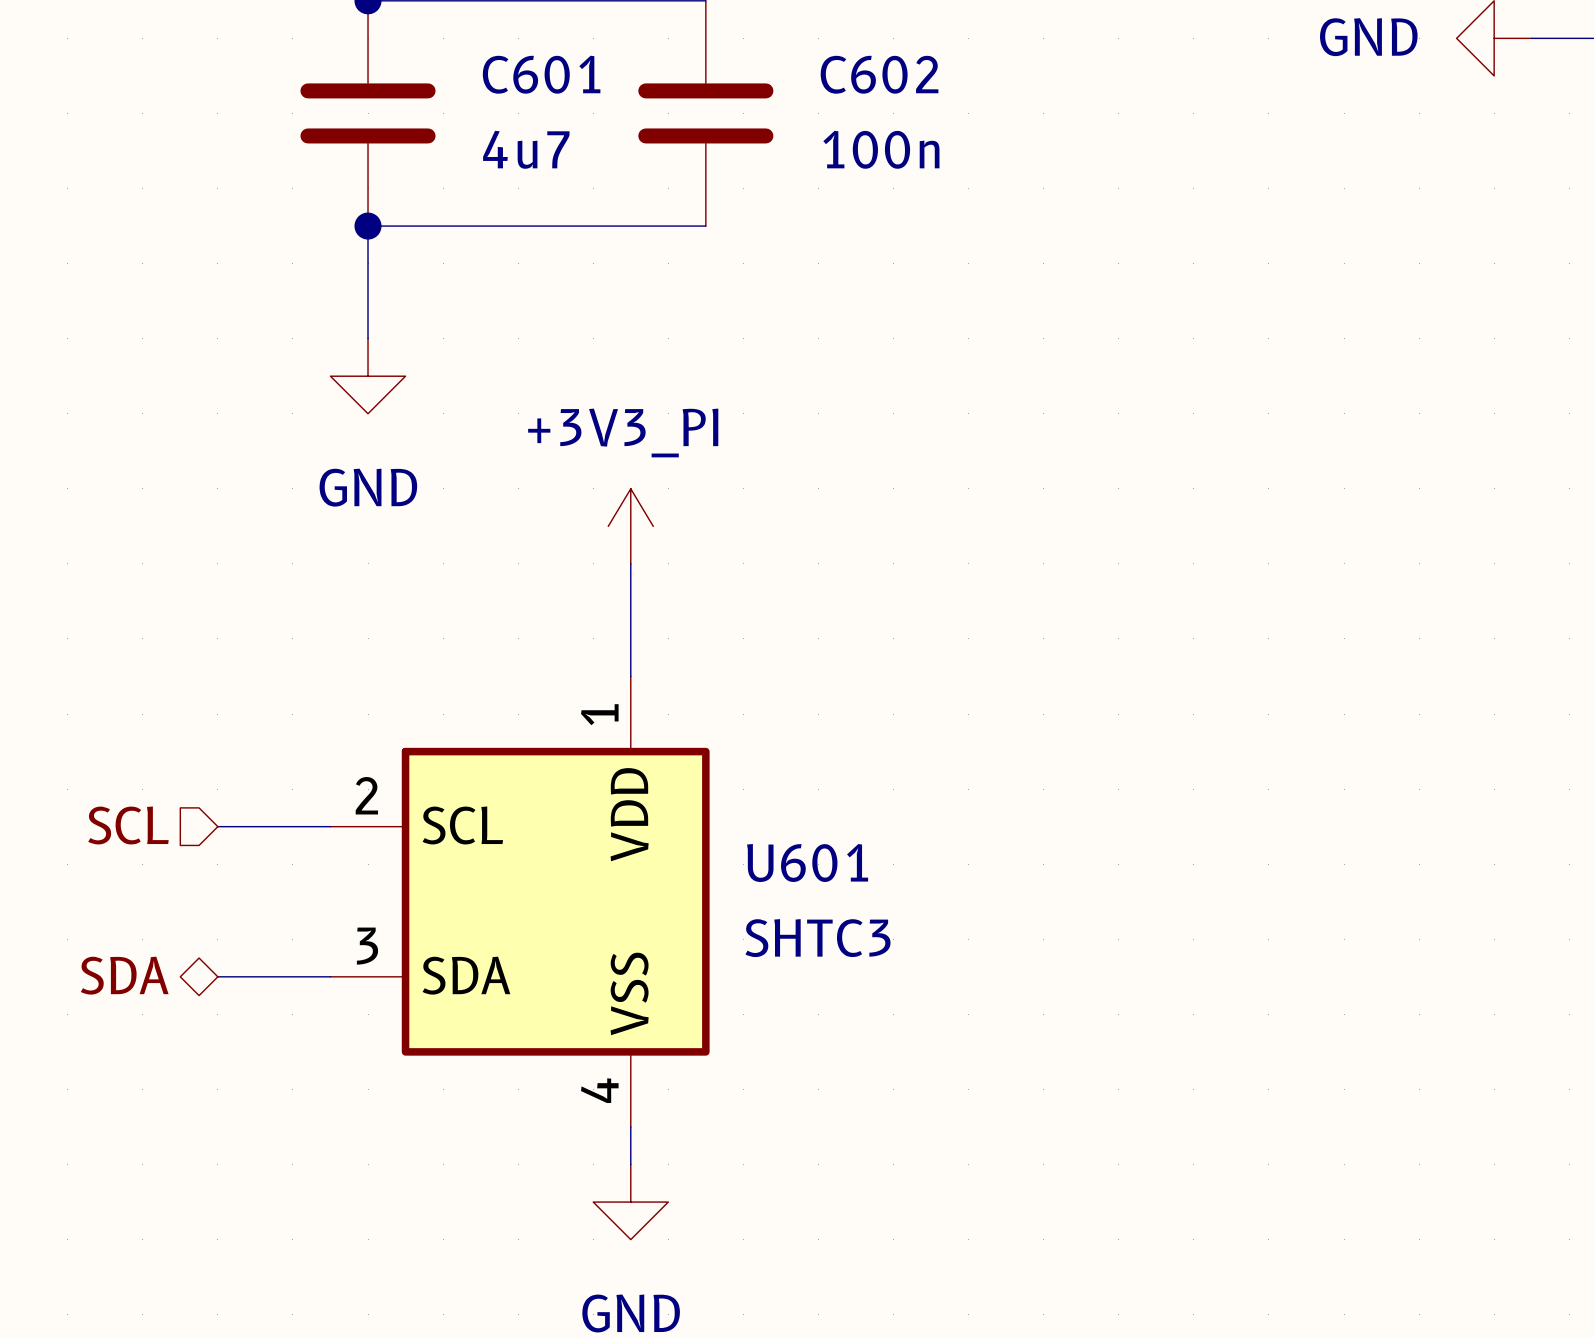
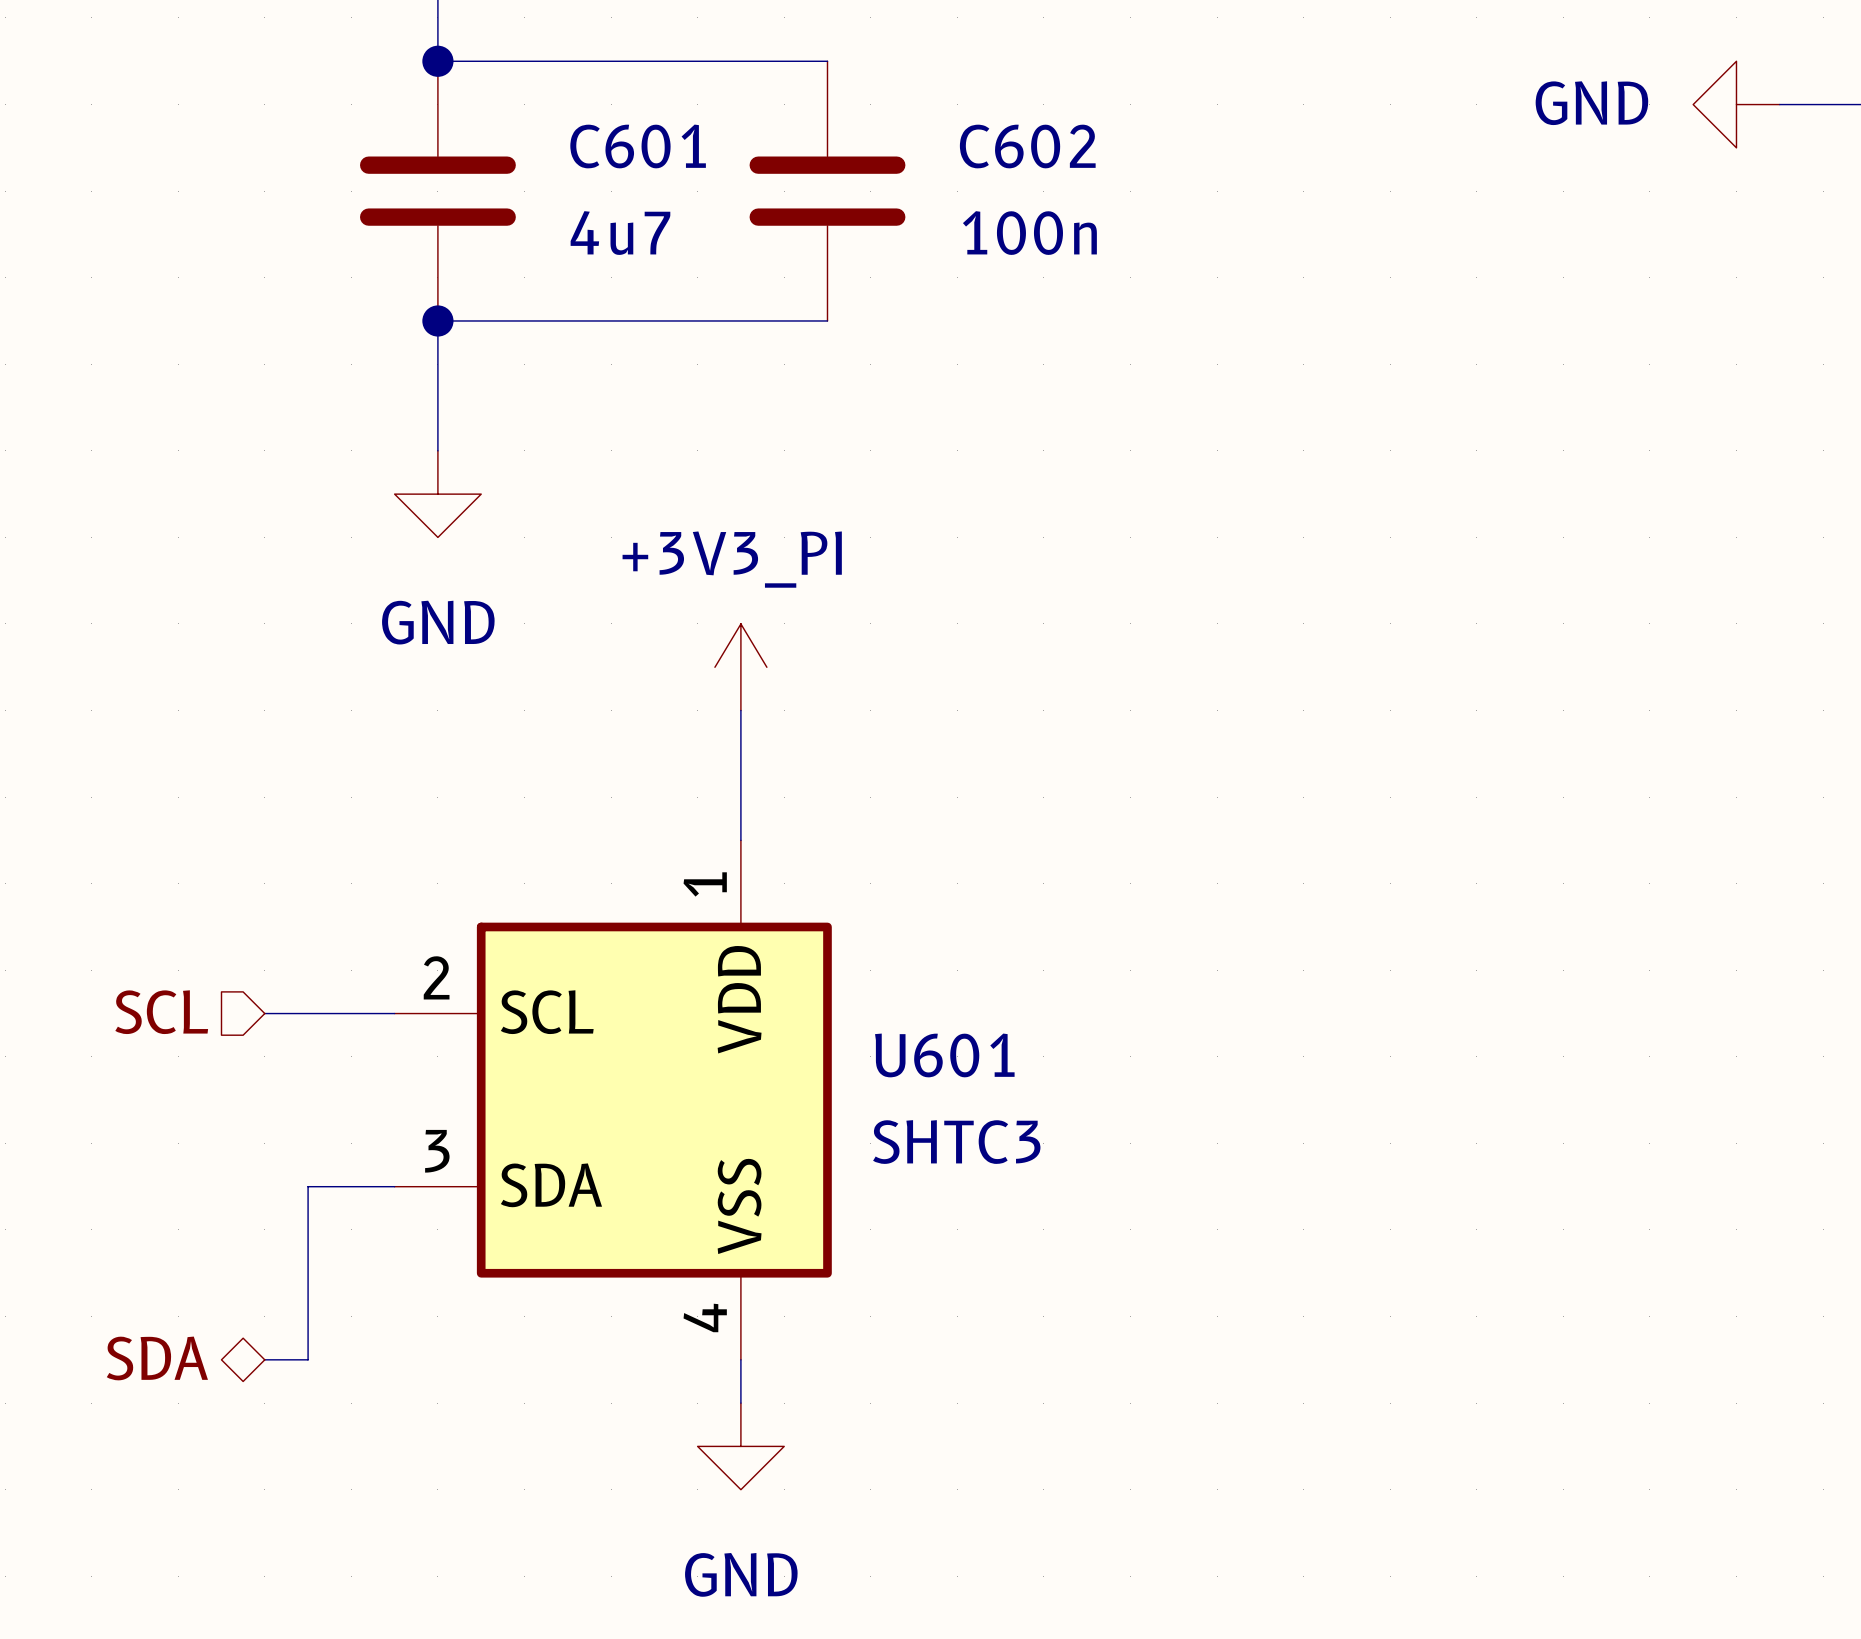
hierarchical label position: SDA (124, 975) -> SDA (157, 1358)
wire: (217, 976) (255, 976) -> (264, 1359) (308, 1359) (308, 1186)

